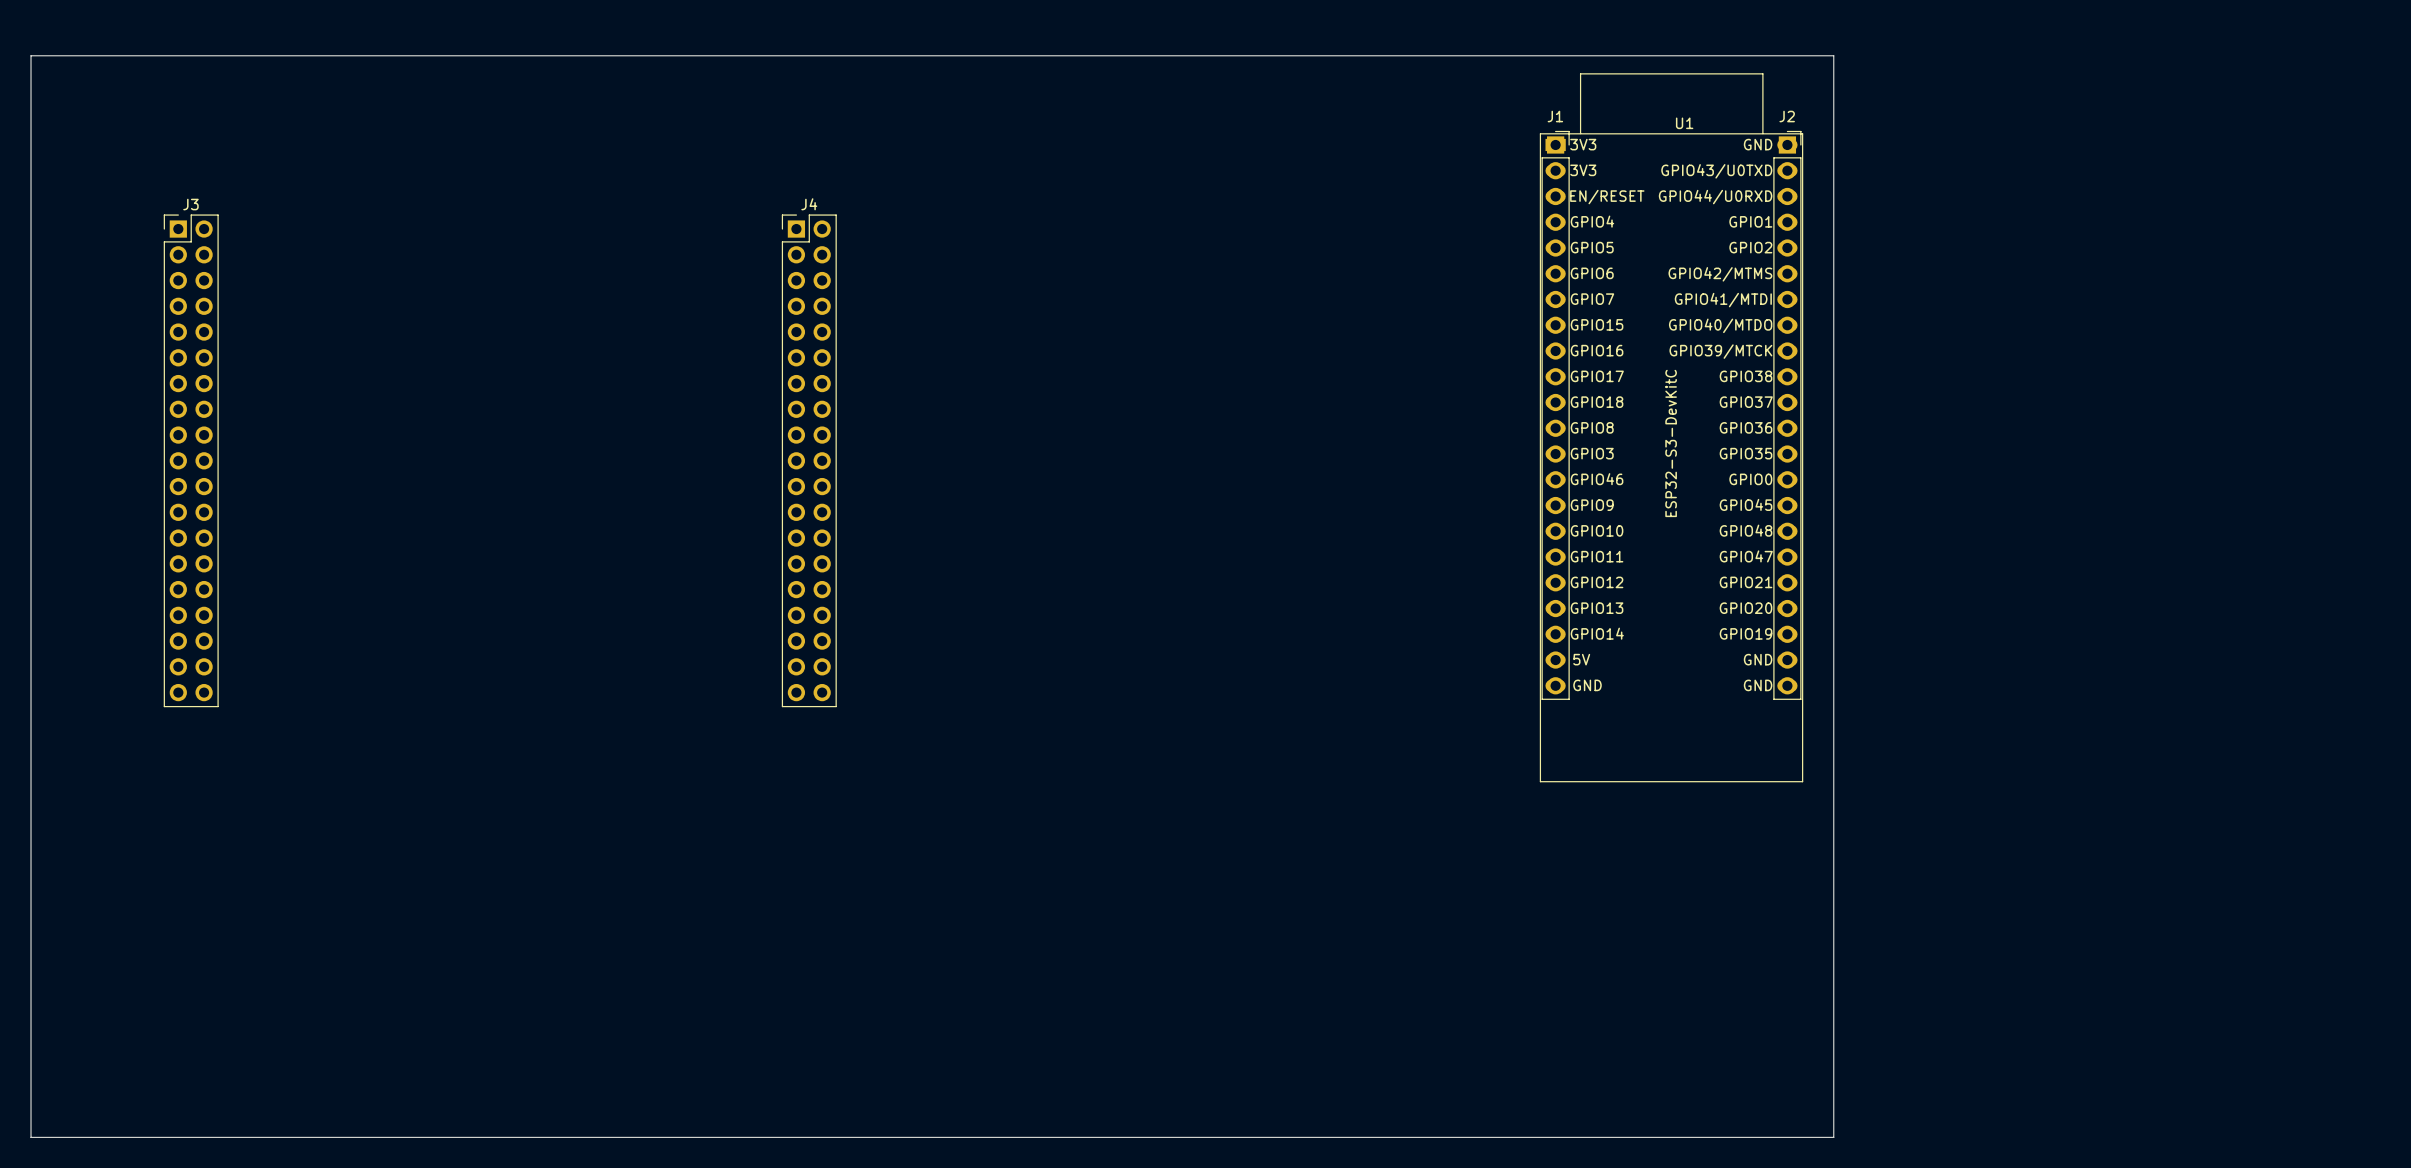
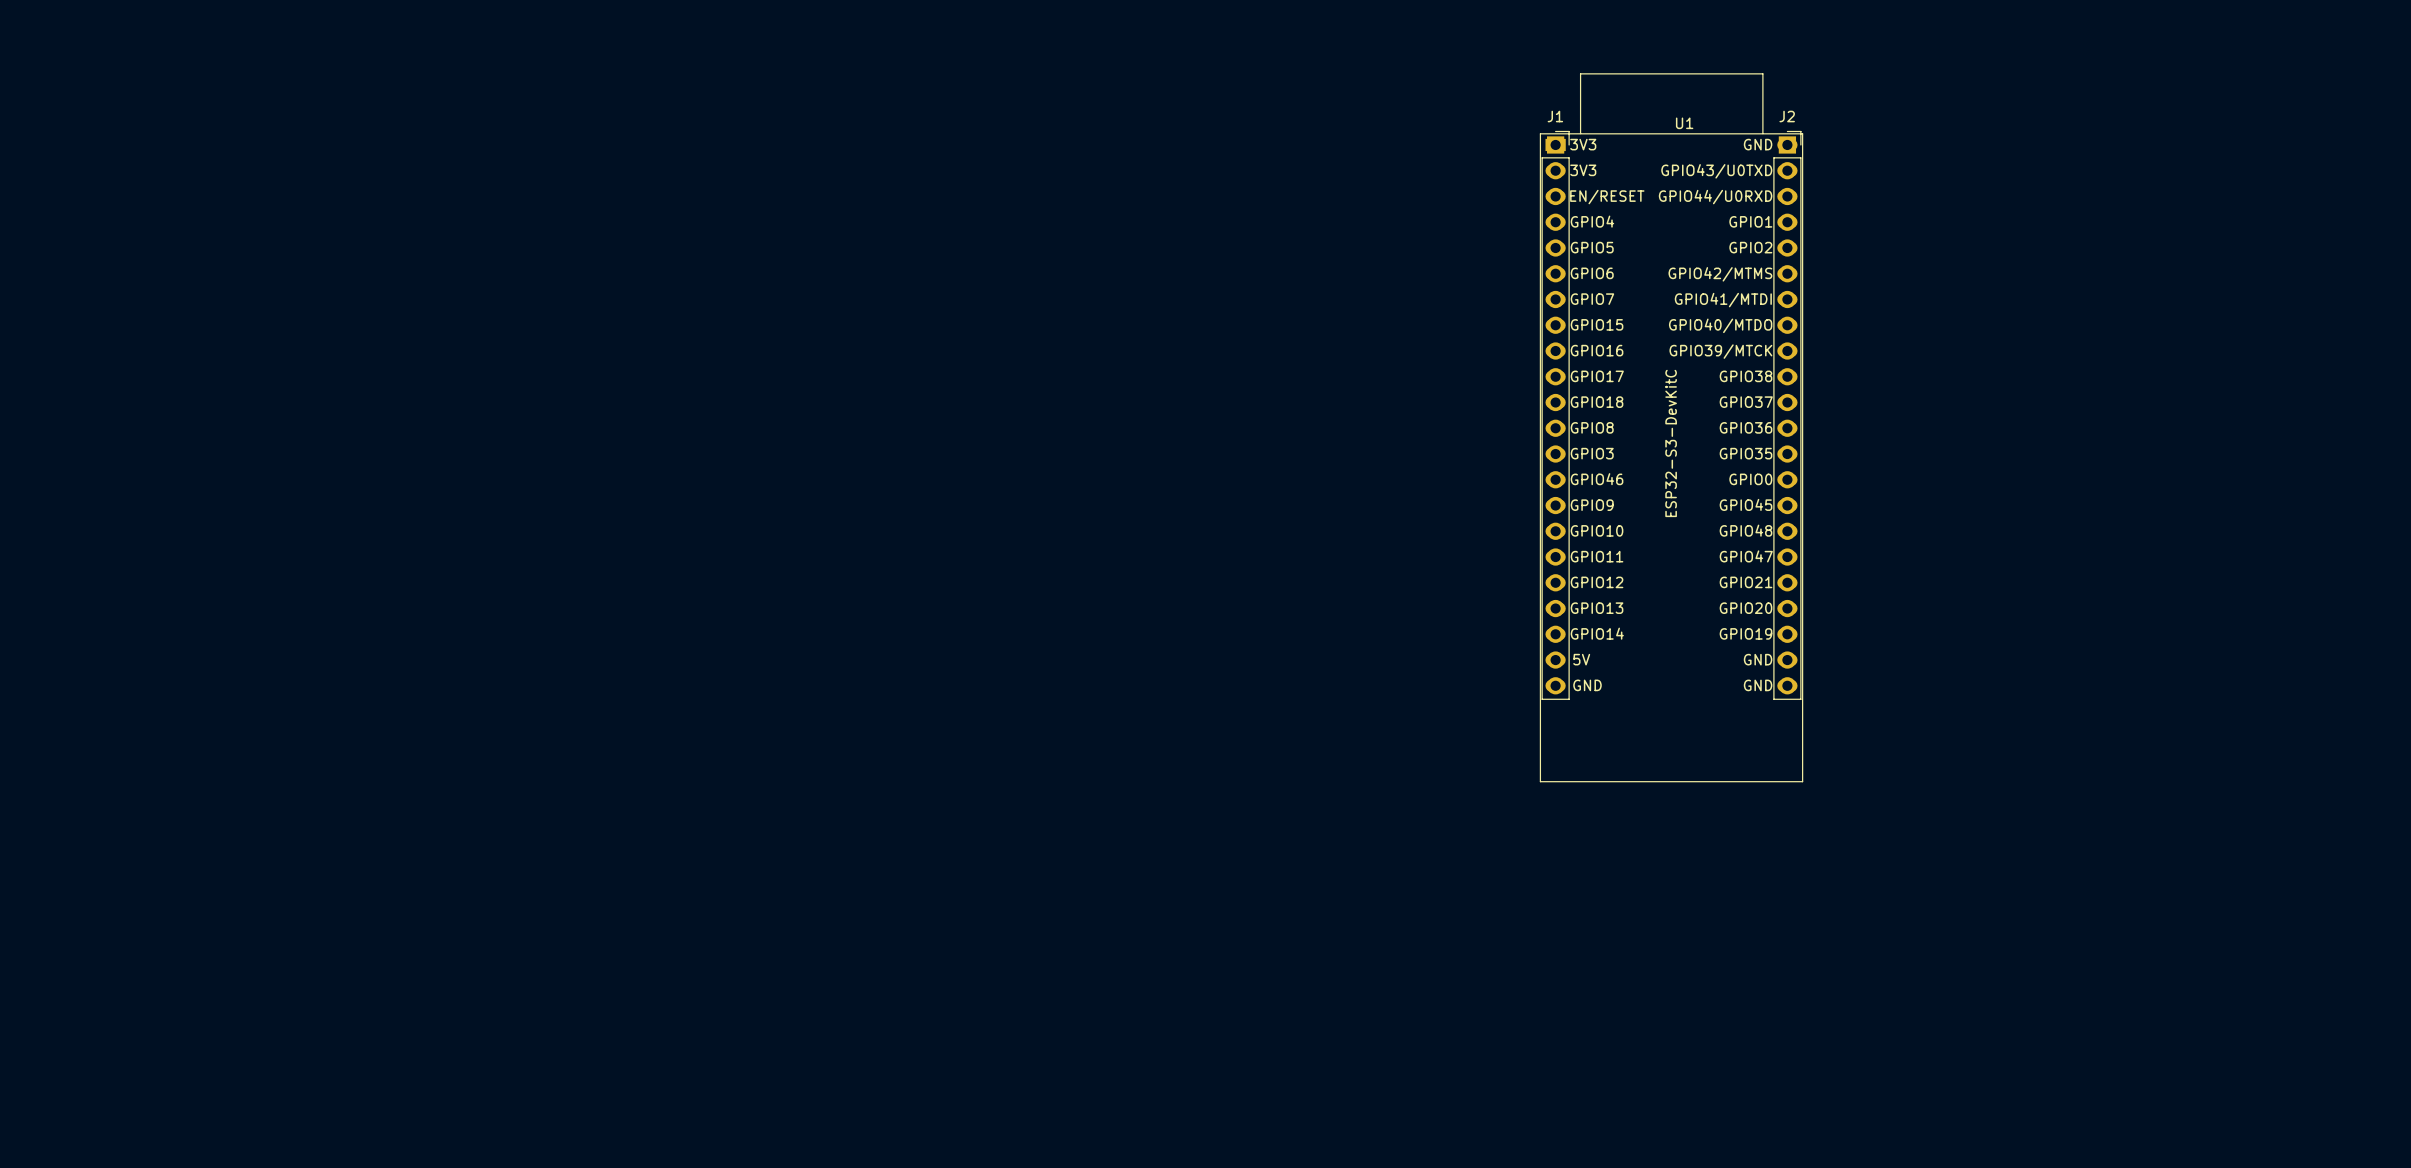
board edge: (31, 55) (1833, 55) (1833, 1137) (31, 1137) (31, 55) -> none
J3: (191, 460) -> none
J4: (809, 460) -> none

